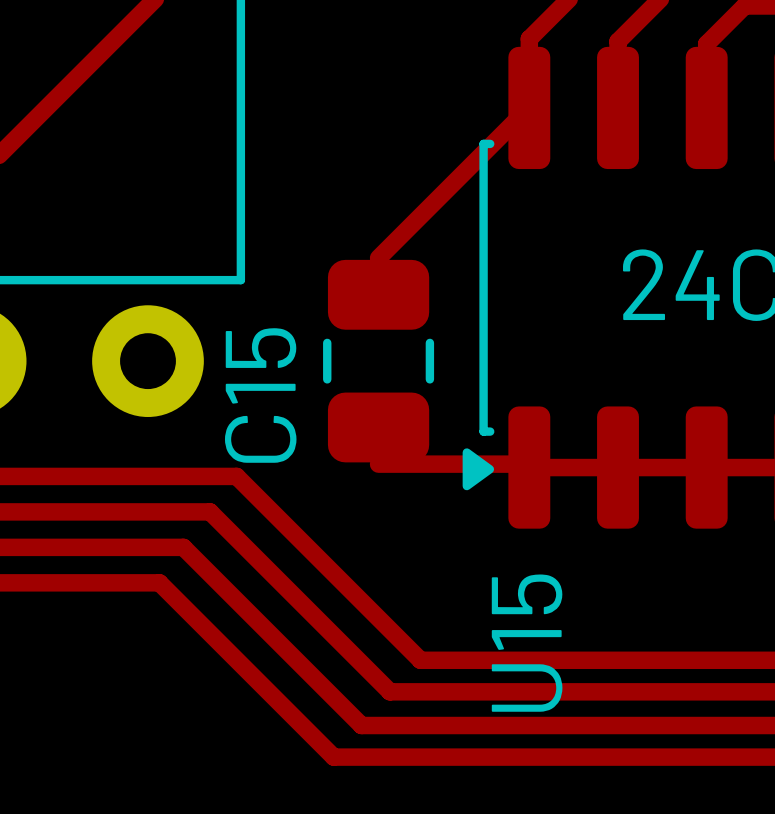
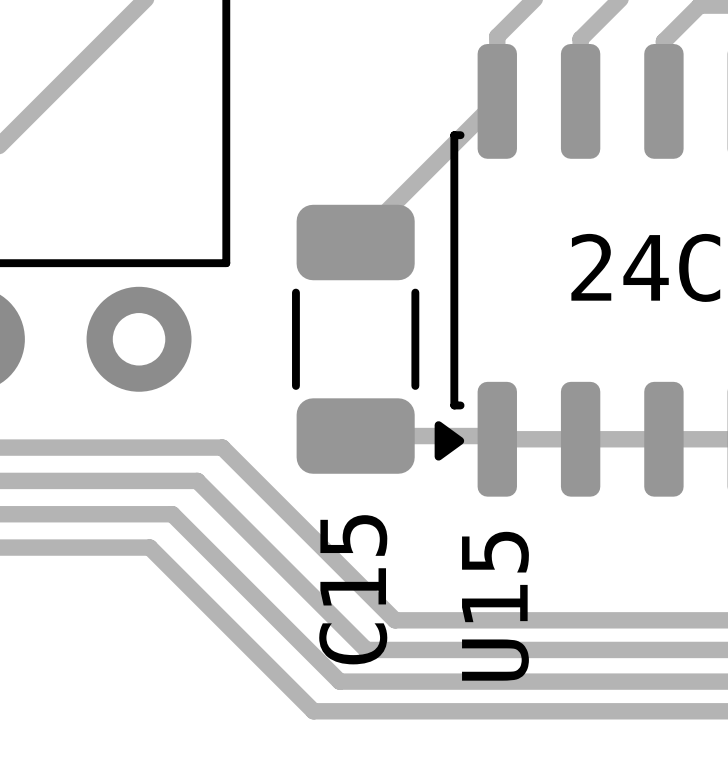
C15 footprint: [323, 259, 435, 463] -> [292, 204, 420, 474]
C15 name position: C15 (260, 395) -> C15 (353, 589)

